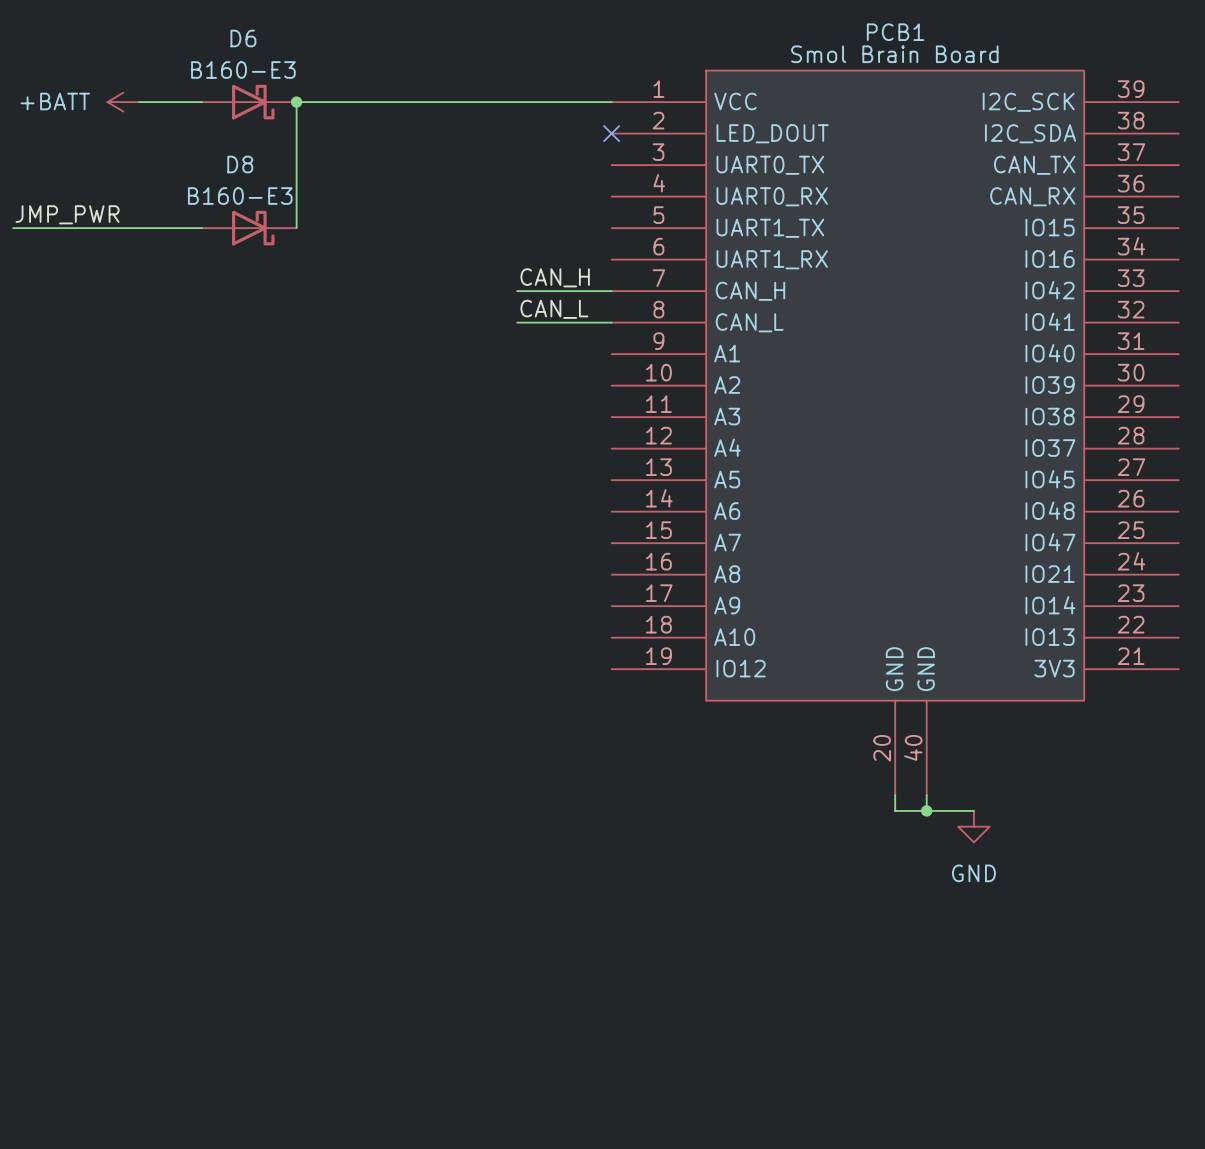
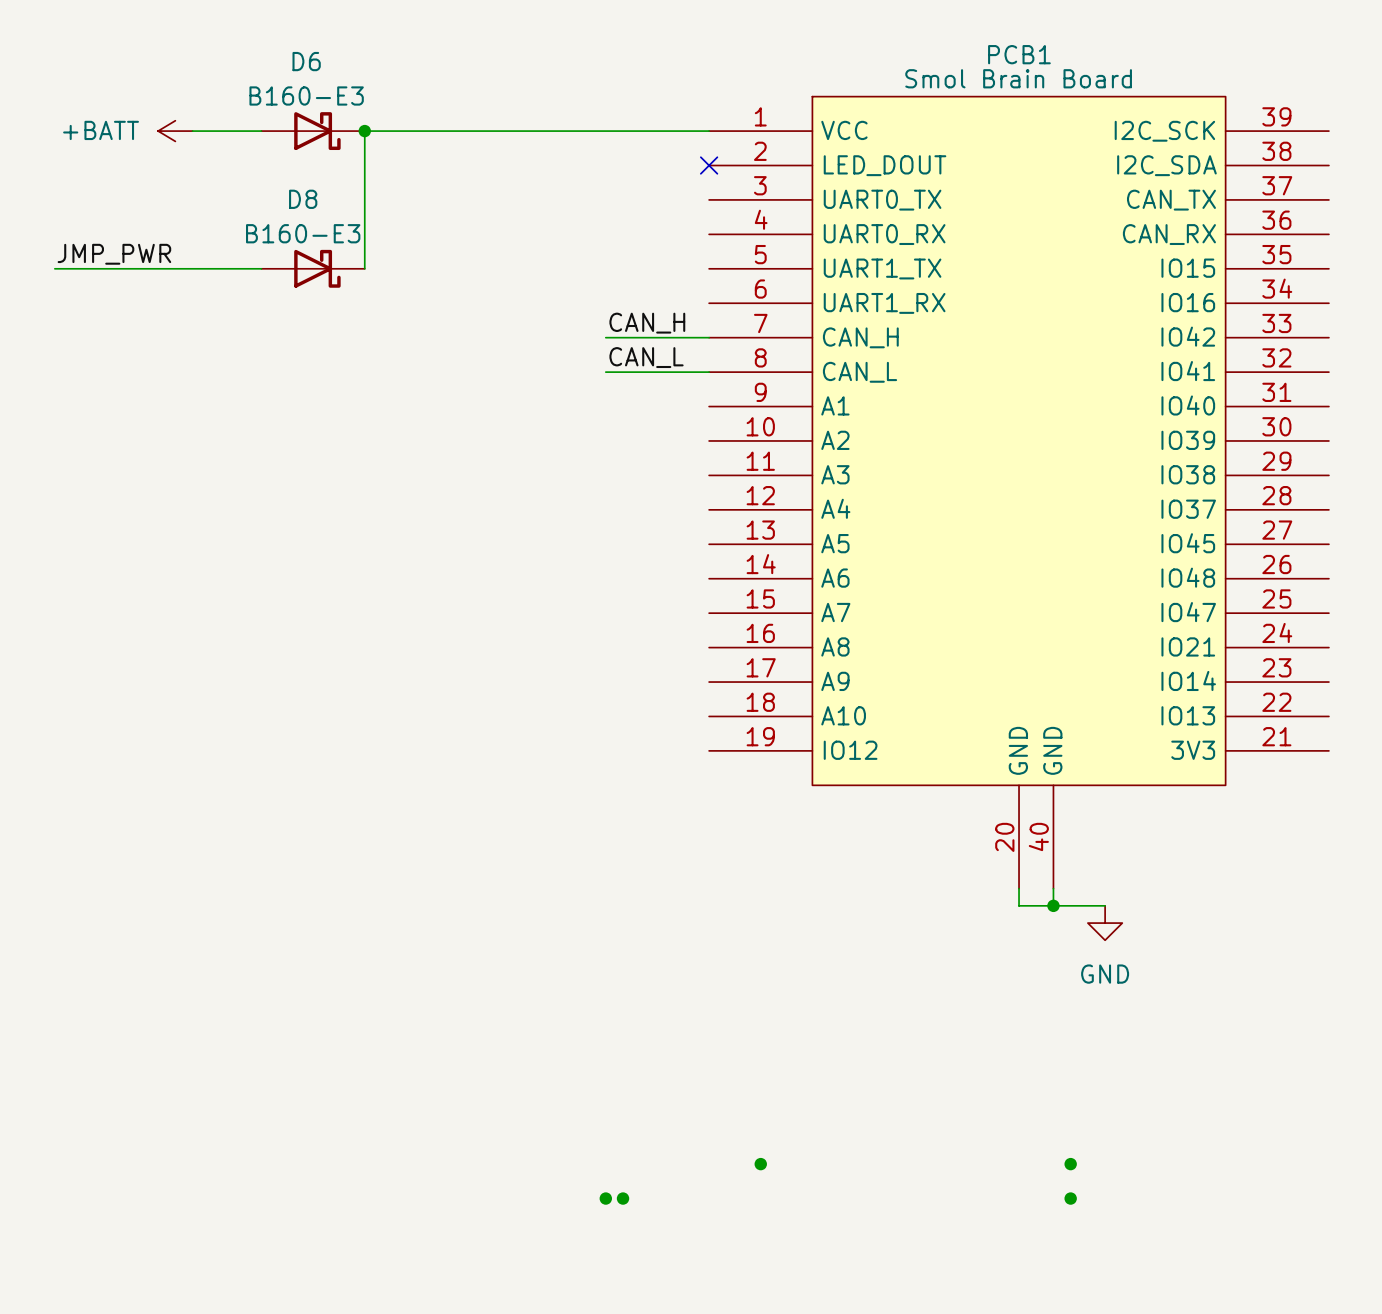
junction: none -> (760, 1164)
junction: none -> (1070, 1164)
junction: none -> (605, 1198)
junction: none -> (623, 1198)
junction: none -> (1070, 1198)

